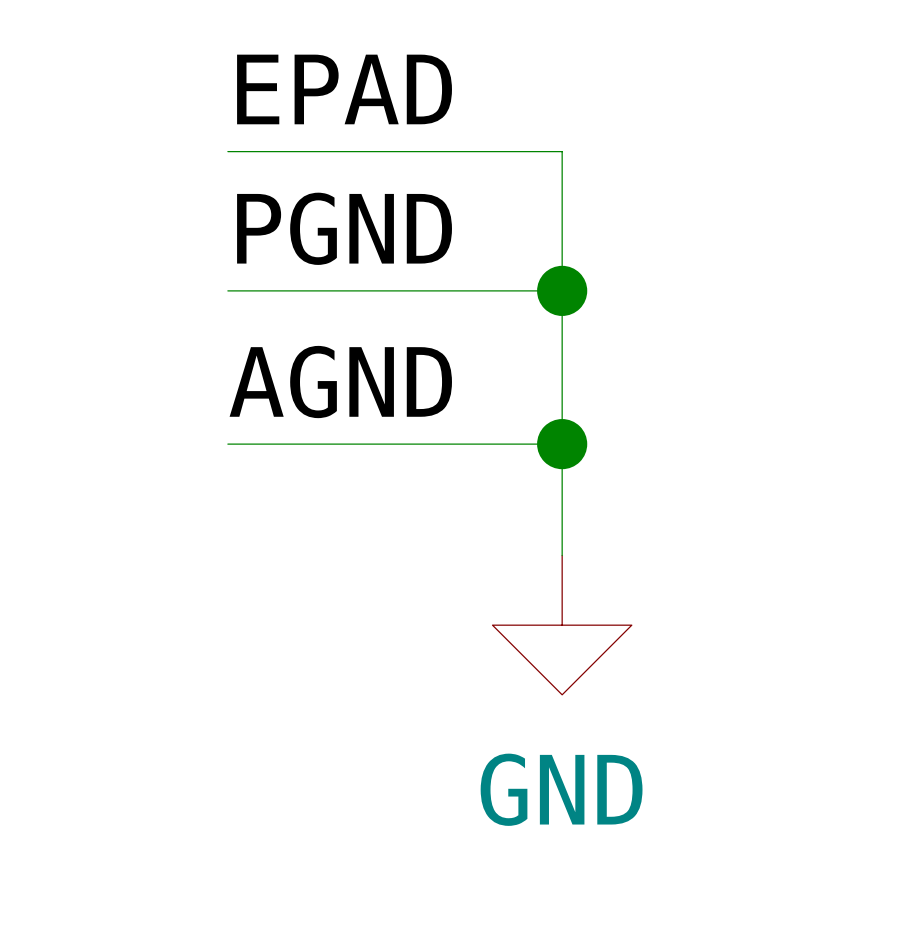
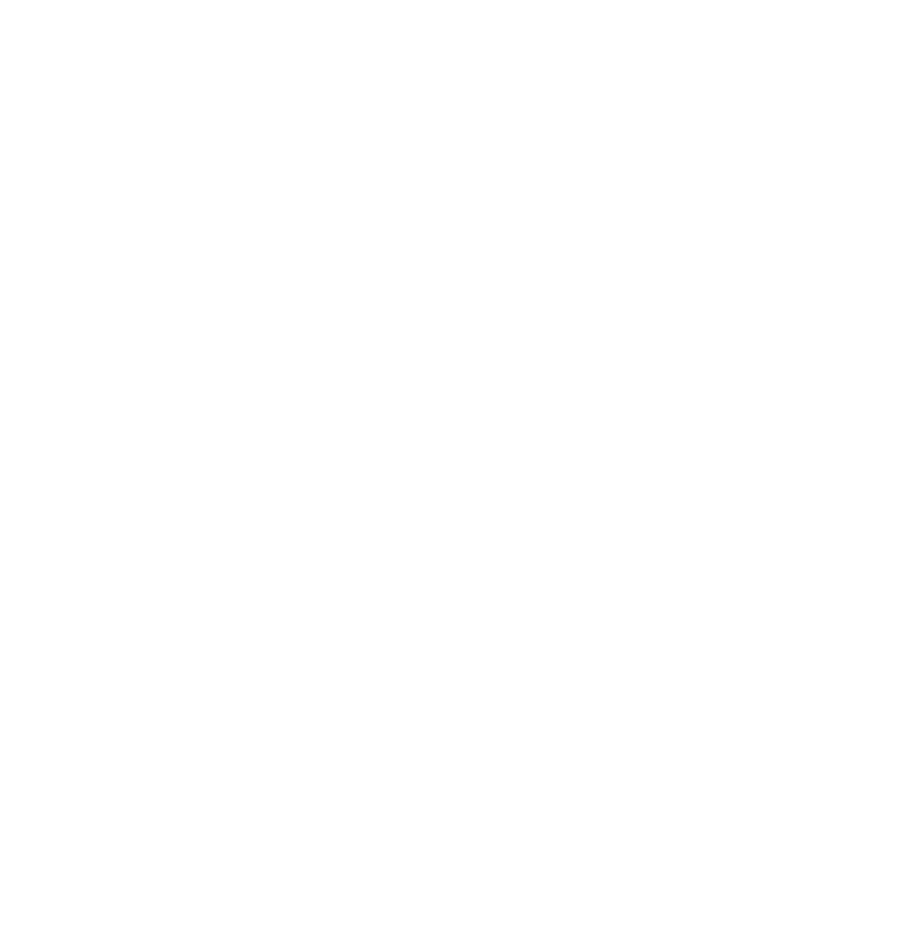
label: EPAD (344, 89) -> none
wire: (227, 151) (562, 151) (562, 555) -> none
label: PGND (344, 228) -> none
wire: (227, 290) (562, 290) -> none
junction: (562, 290) -> none
label: AGND (340, 382) -> none
wire: (227, 444) (562, 444) -> none
junction: (562, 444) -> none
power symbol: GND (562, 625) -> none

